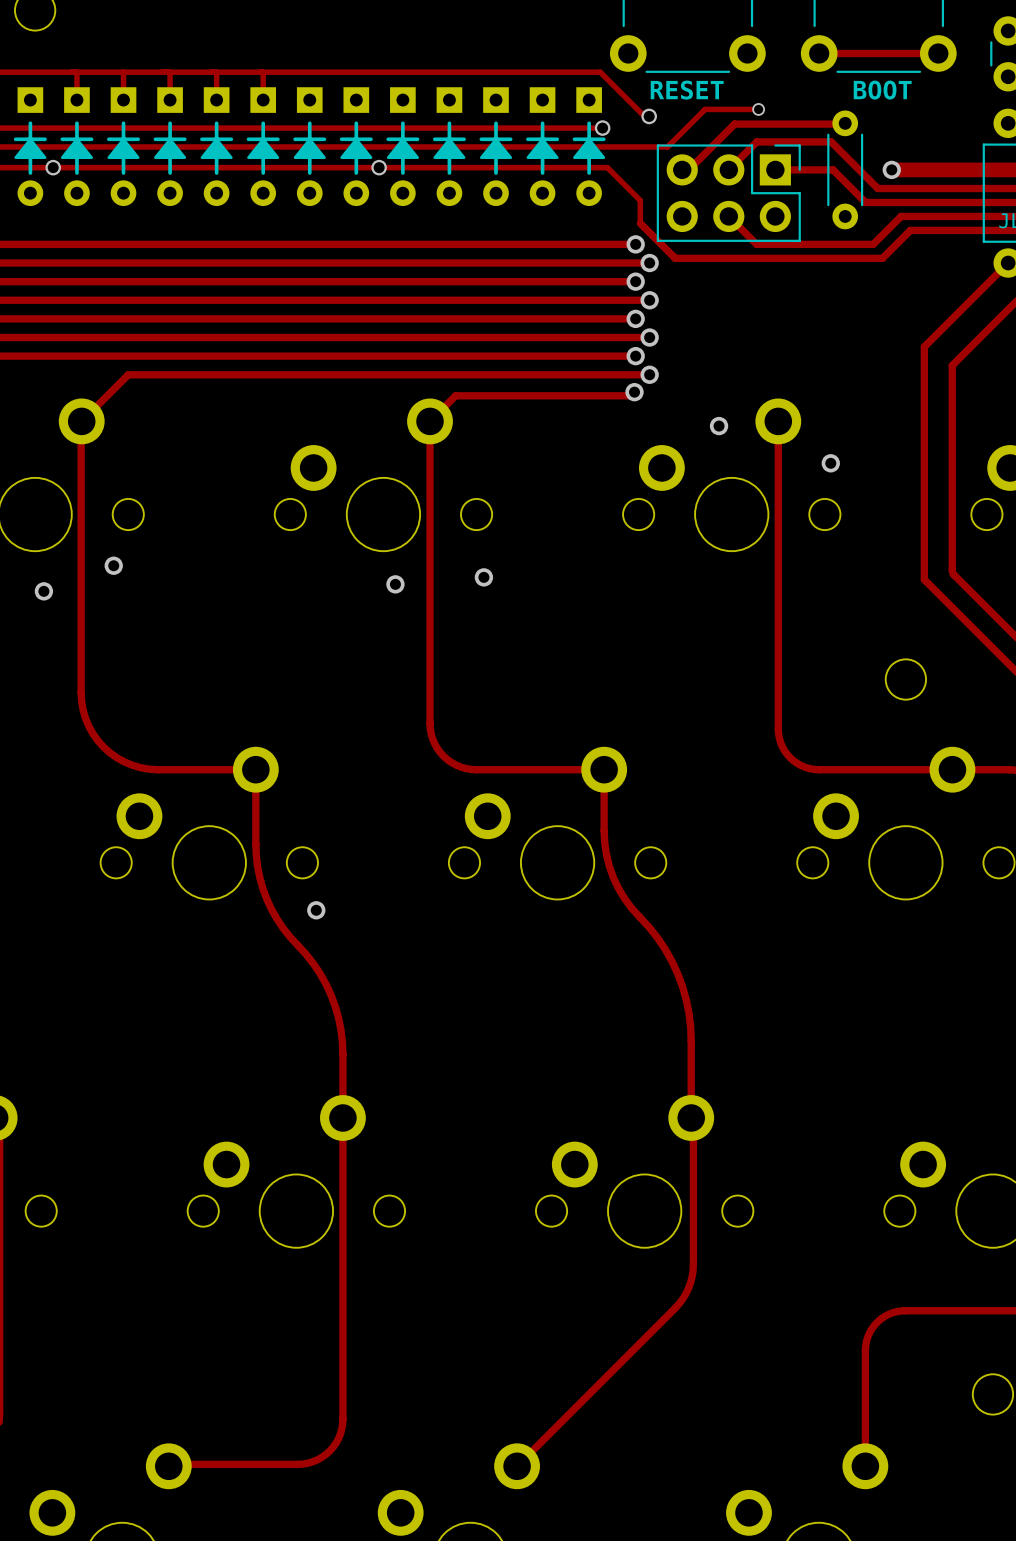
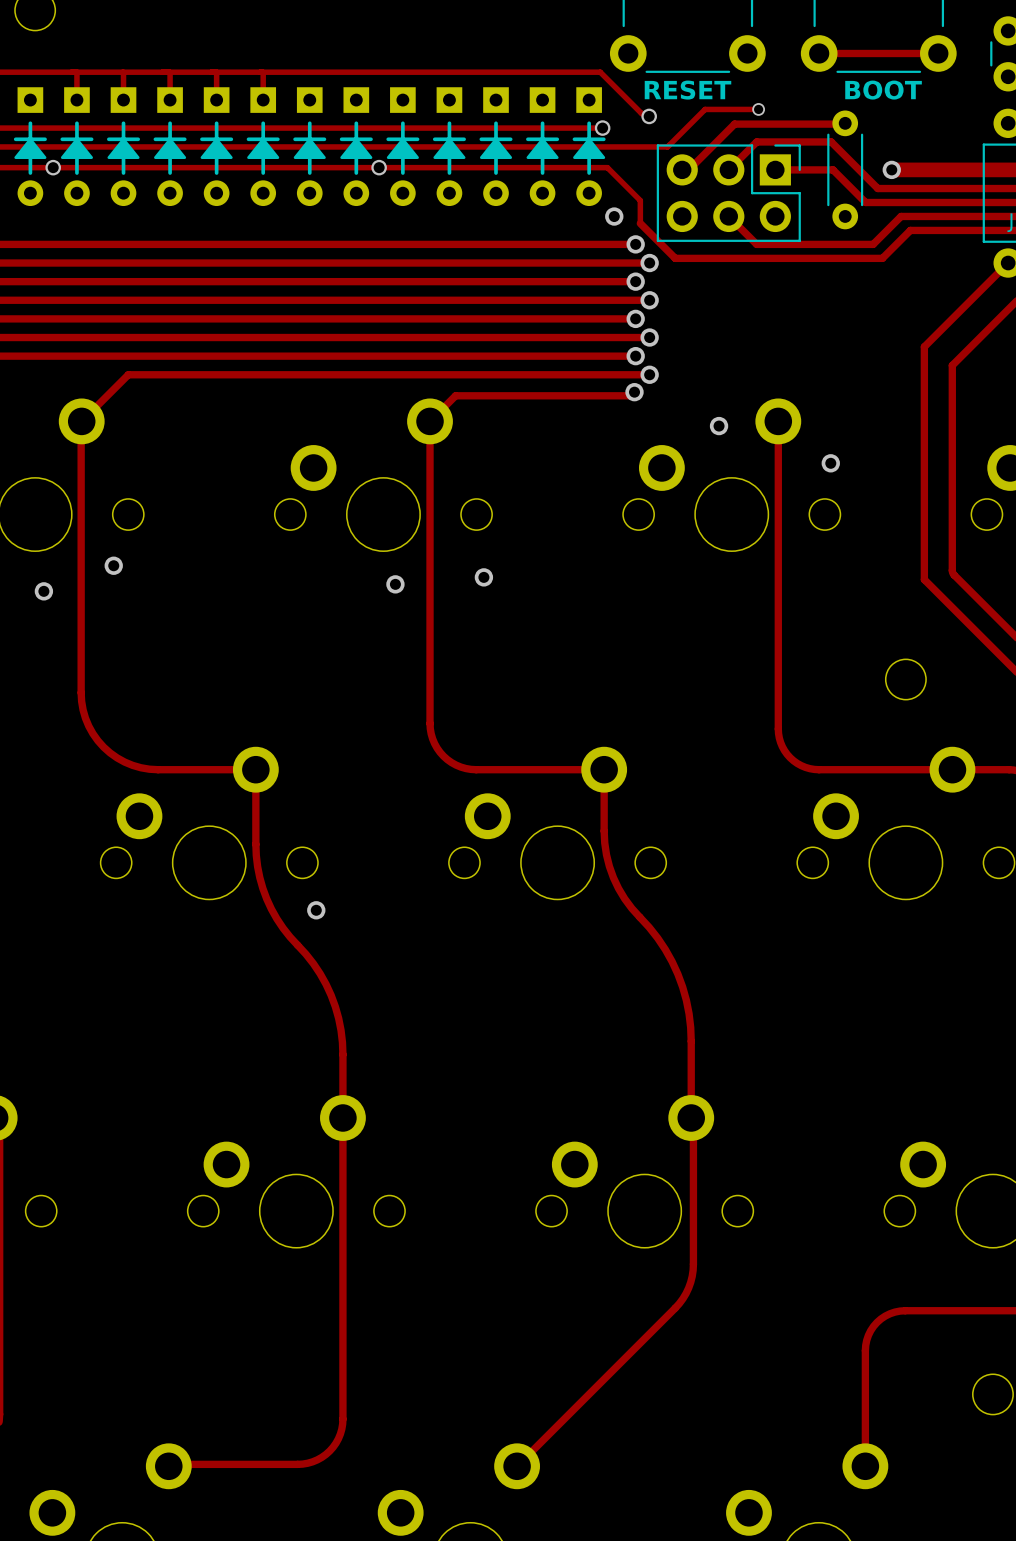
via: none -> (614, 216)

